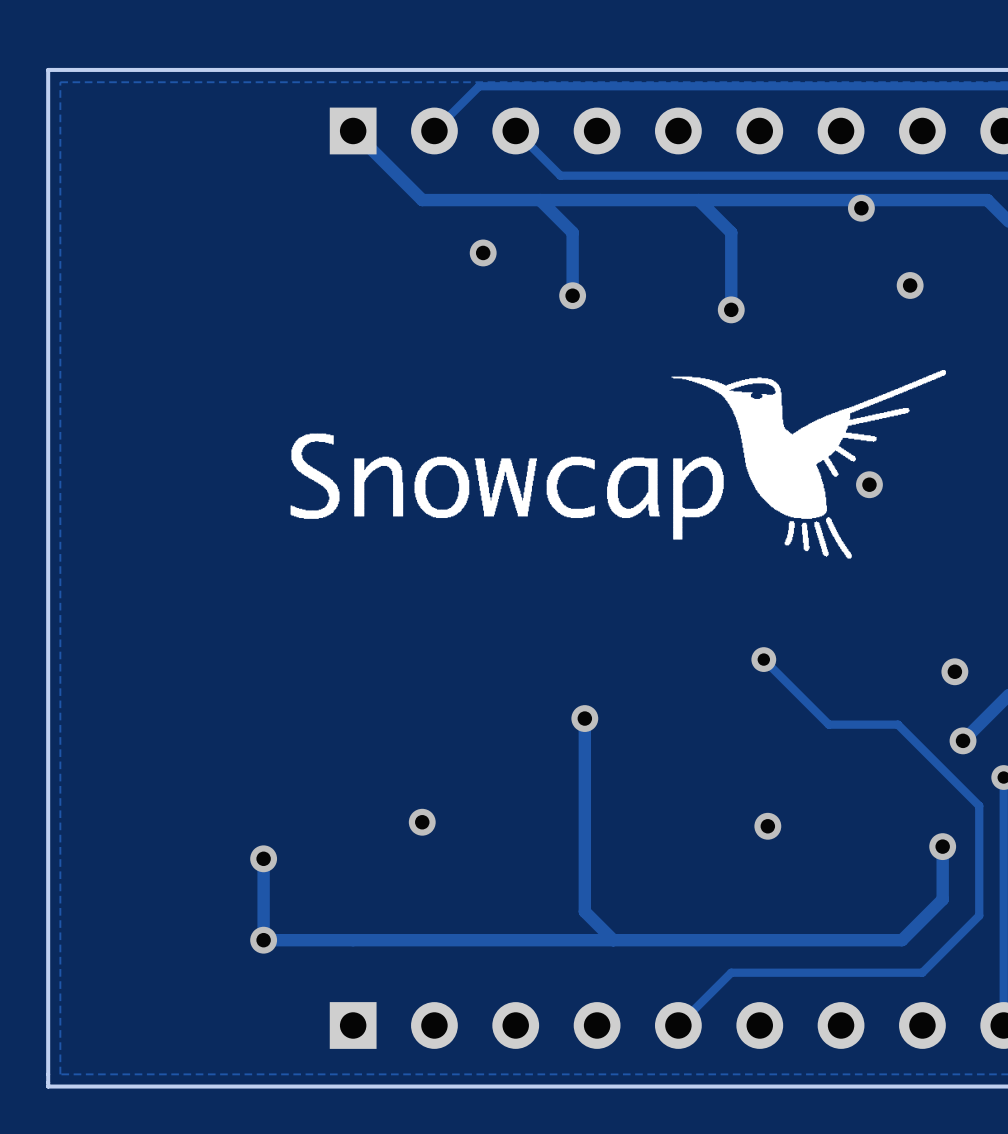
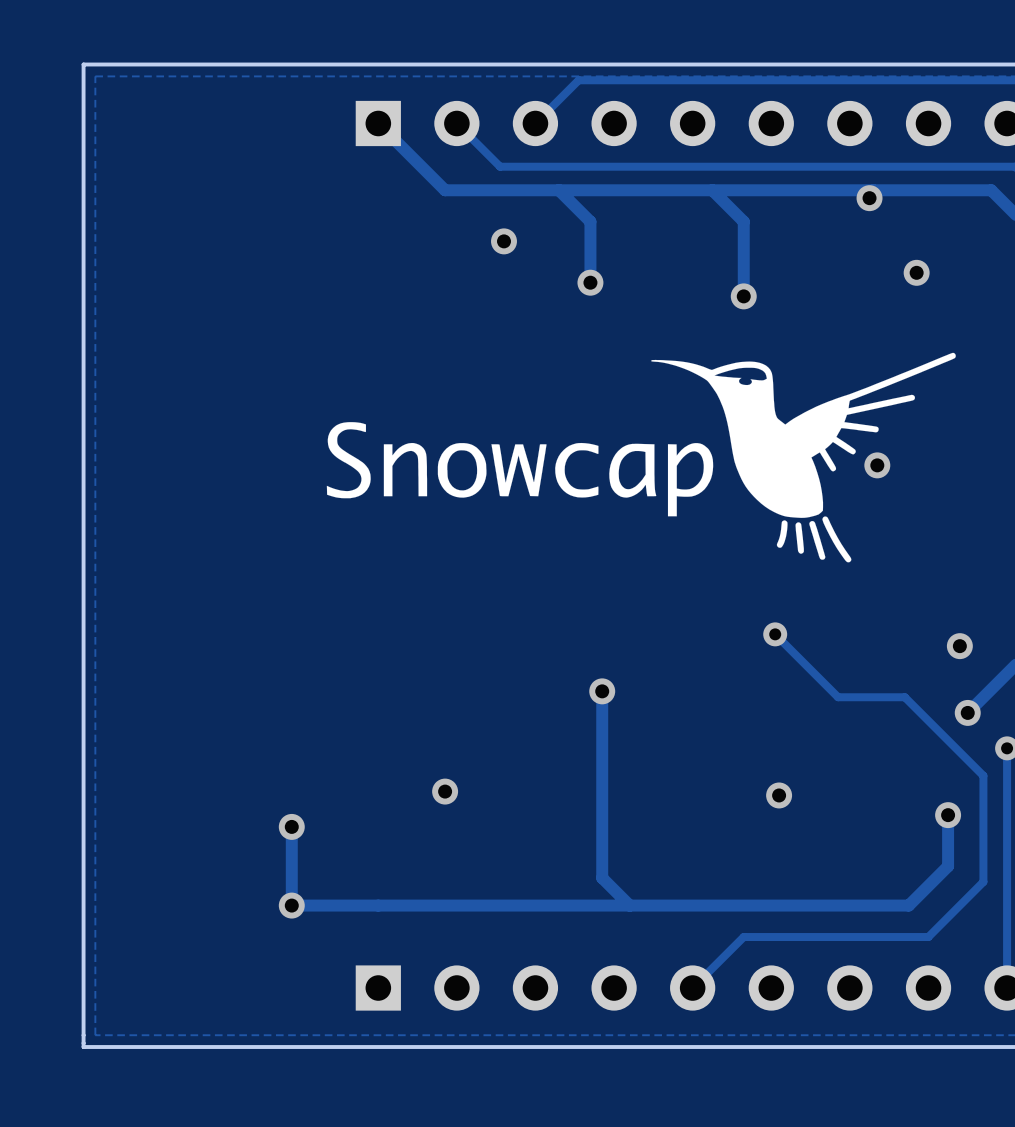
track: (560, 86) (479, 86) (434, 130) -> (578, 80) (535, 123)
track: (515, 130) (560, 175) -> (456, 123) (500, 166) (578, 166)
drawing shape: [290, 370, 946, 559] -> [326, 352, 956, 563]

